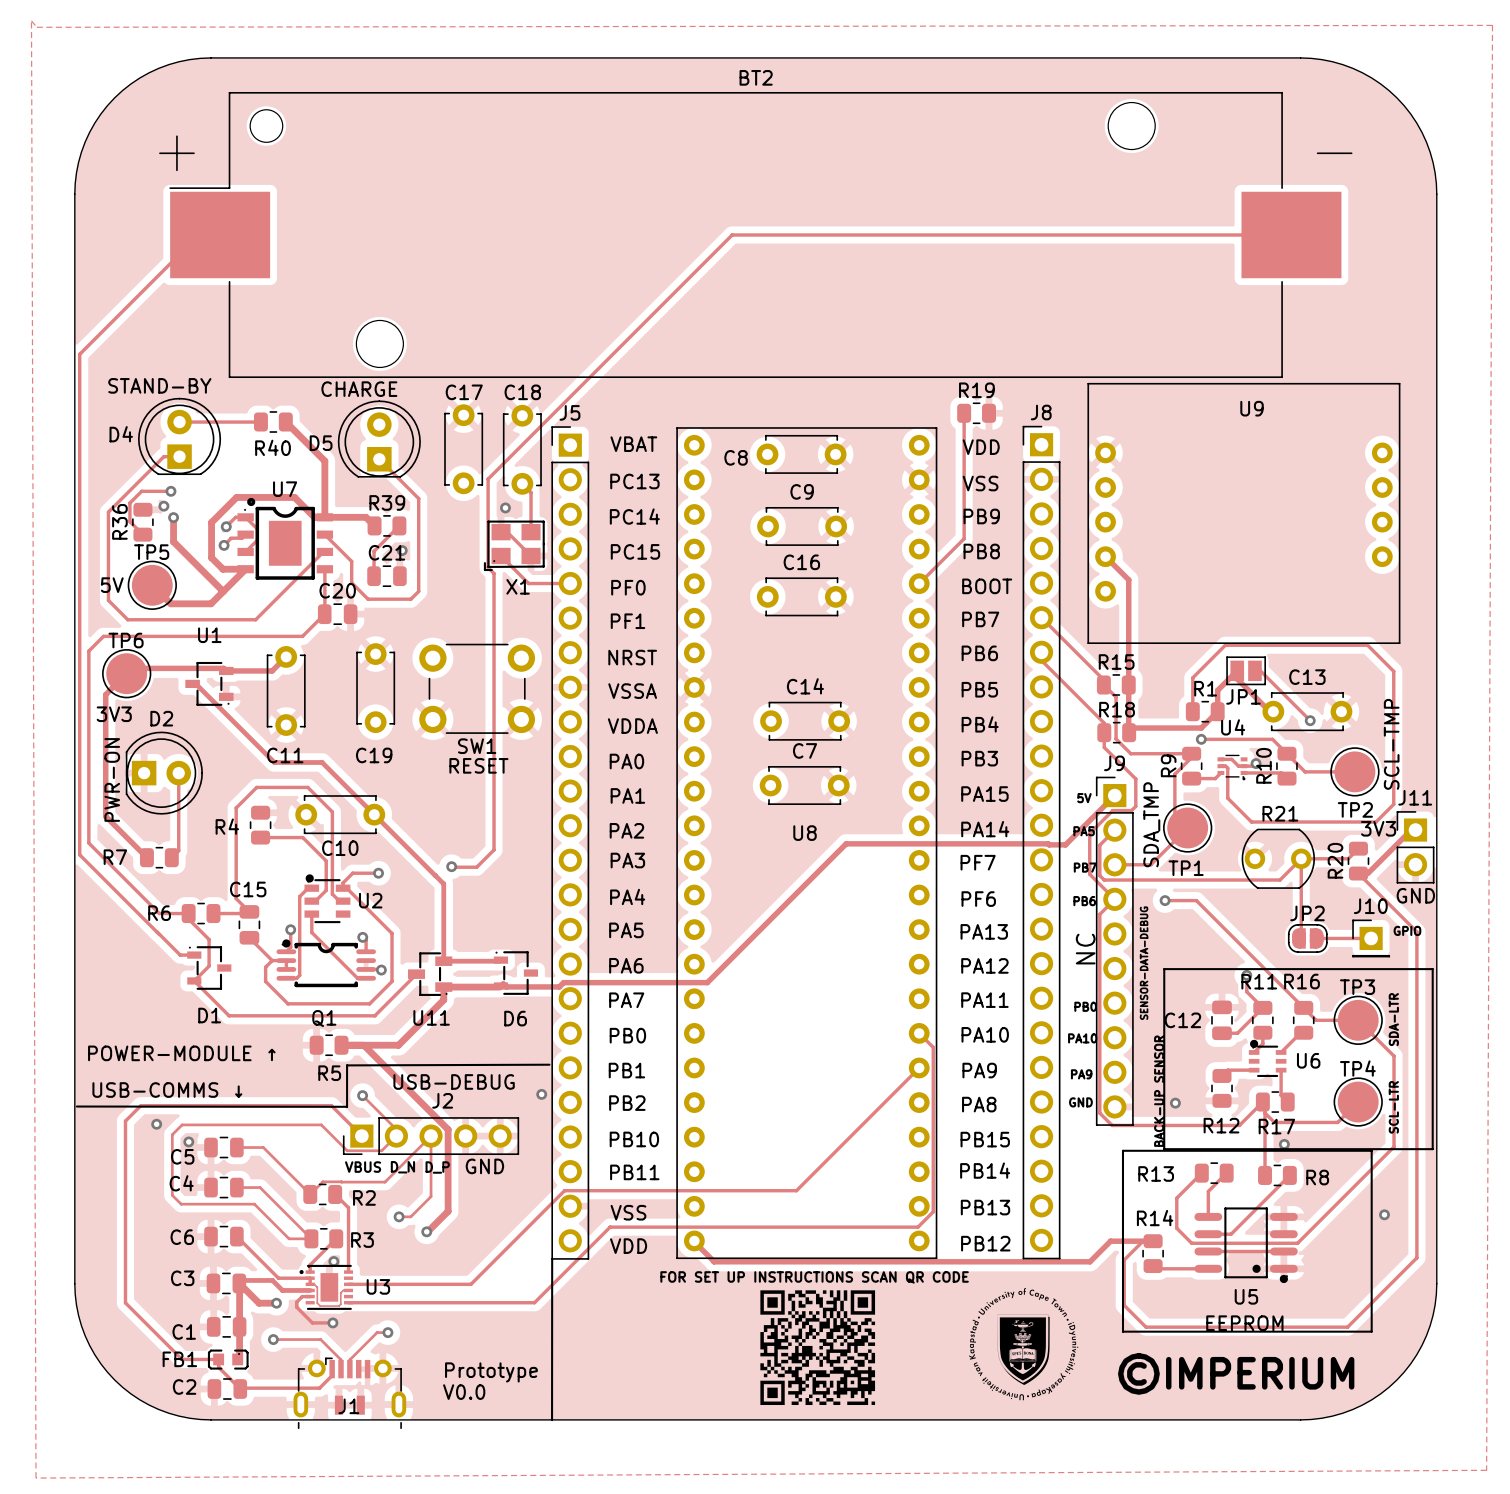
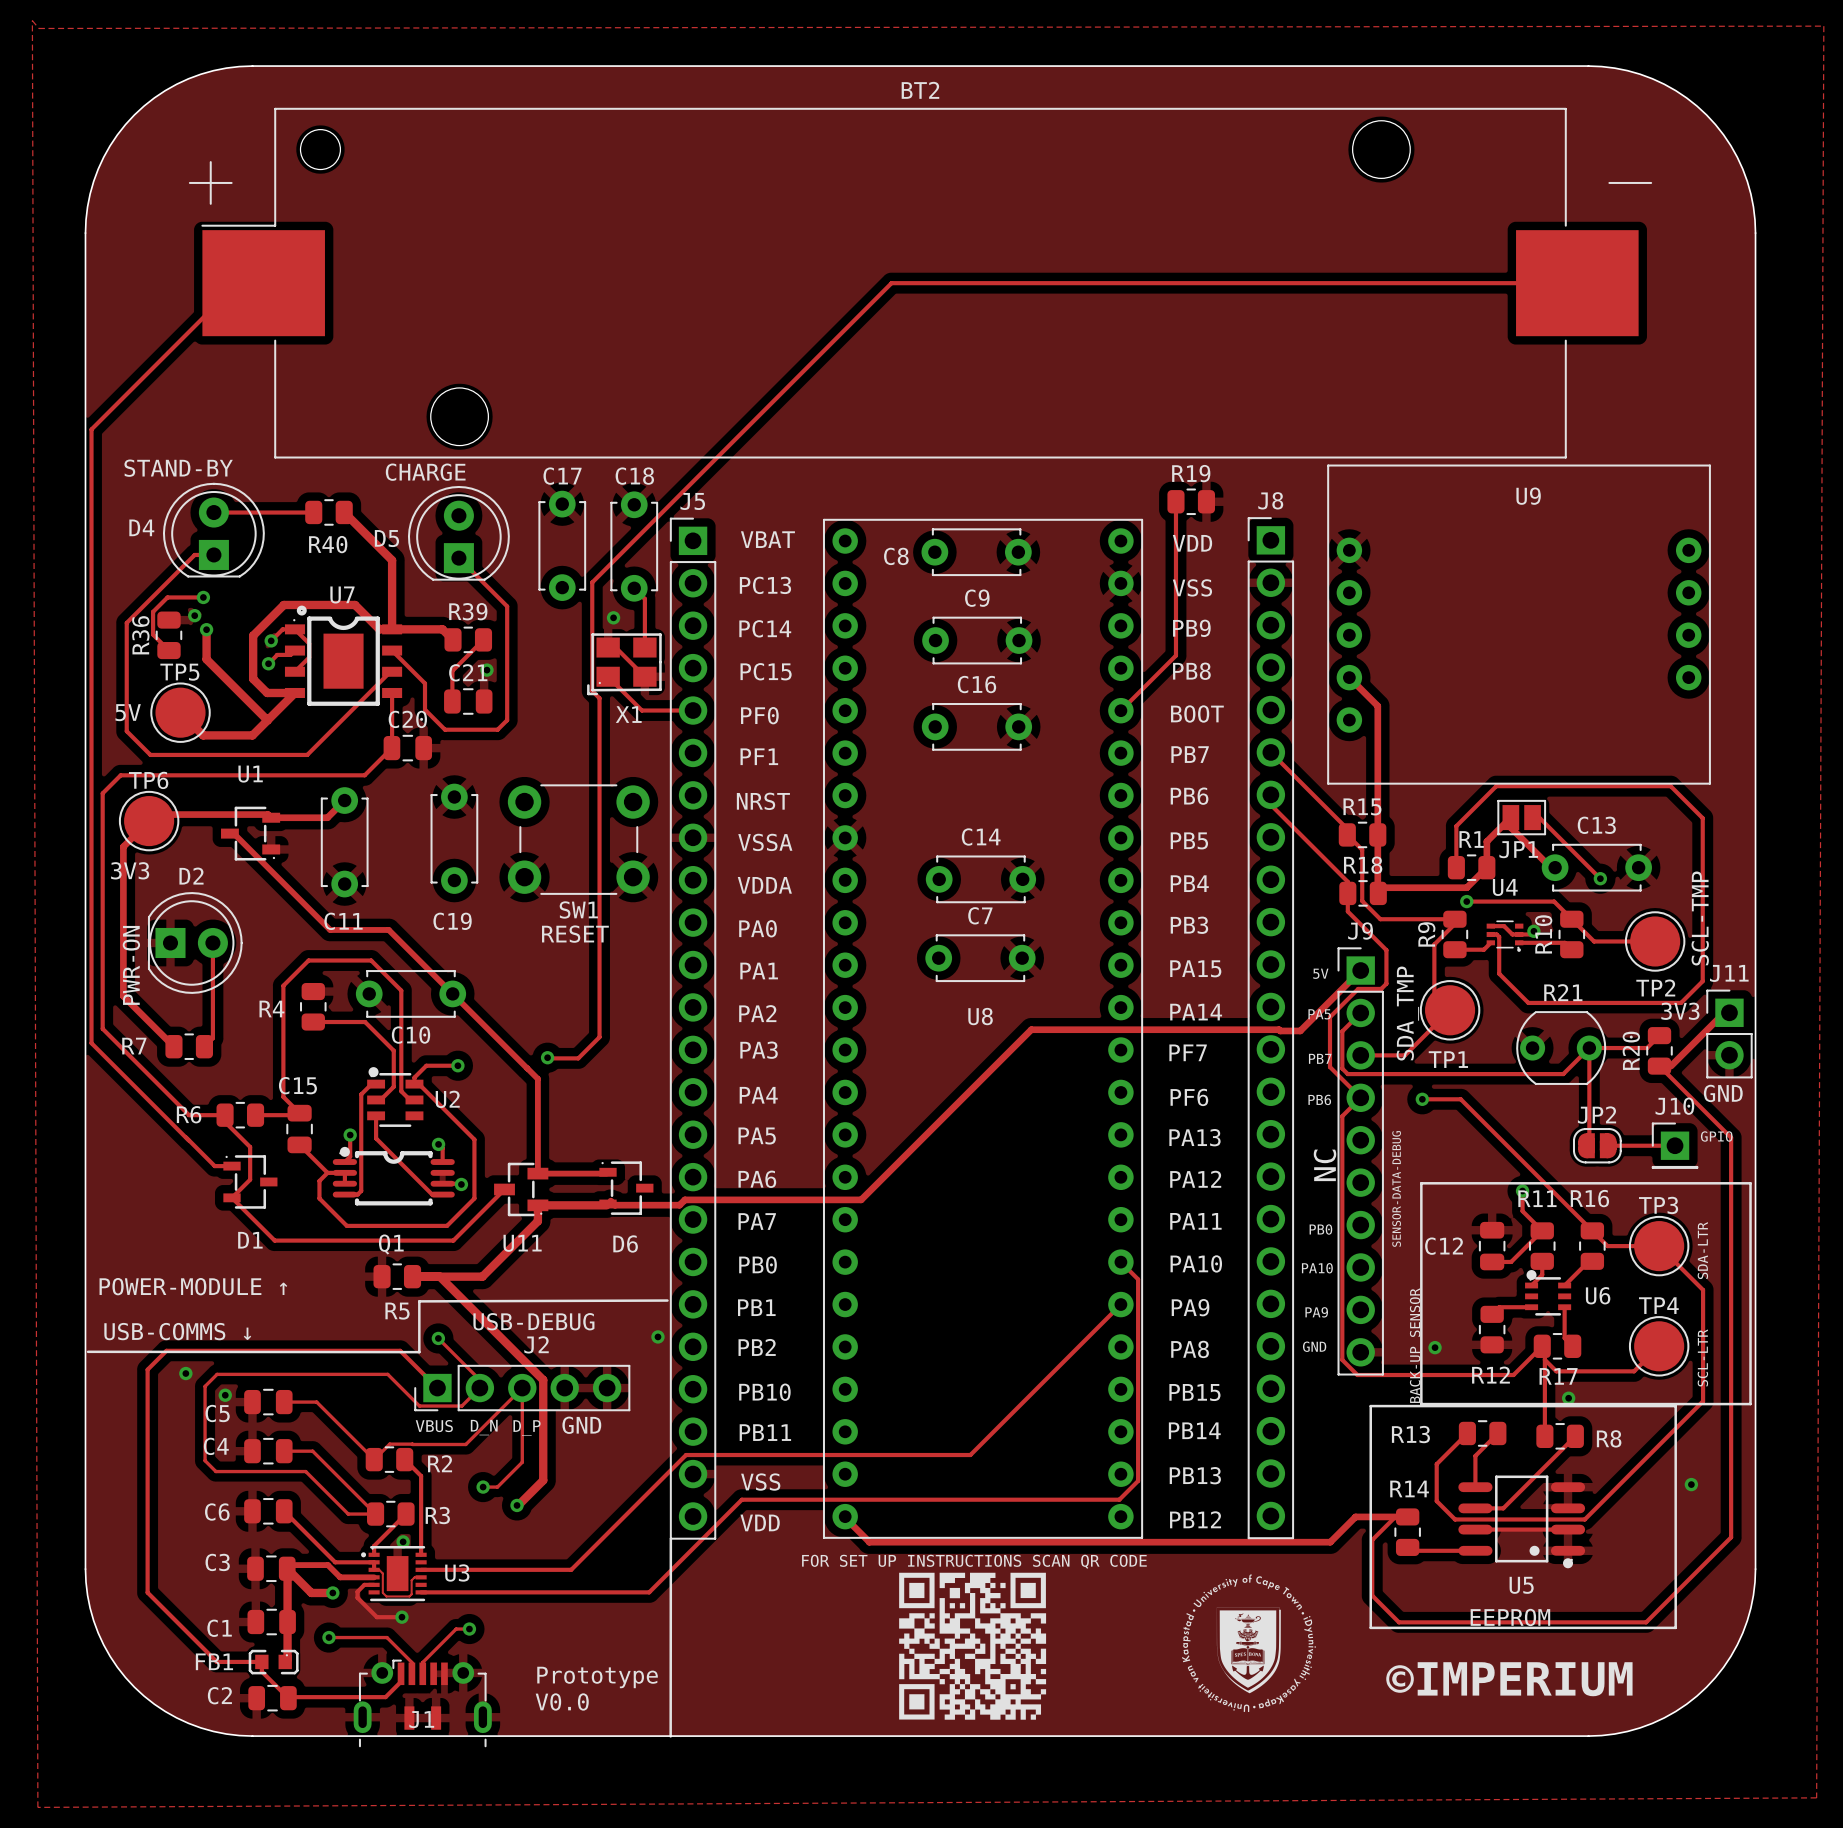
drawing: none -> [899, 1572, 1047, 1720]
drawing: [760, 1290, 876, 1406] -> none

